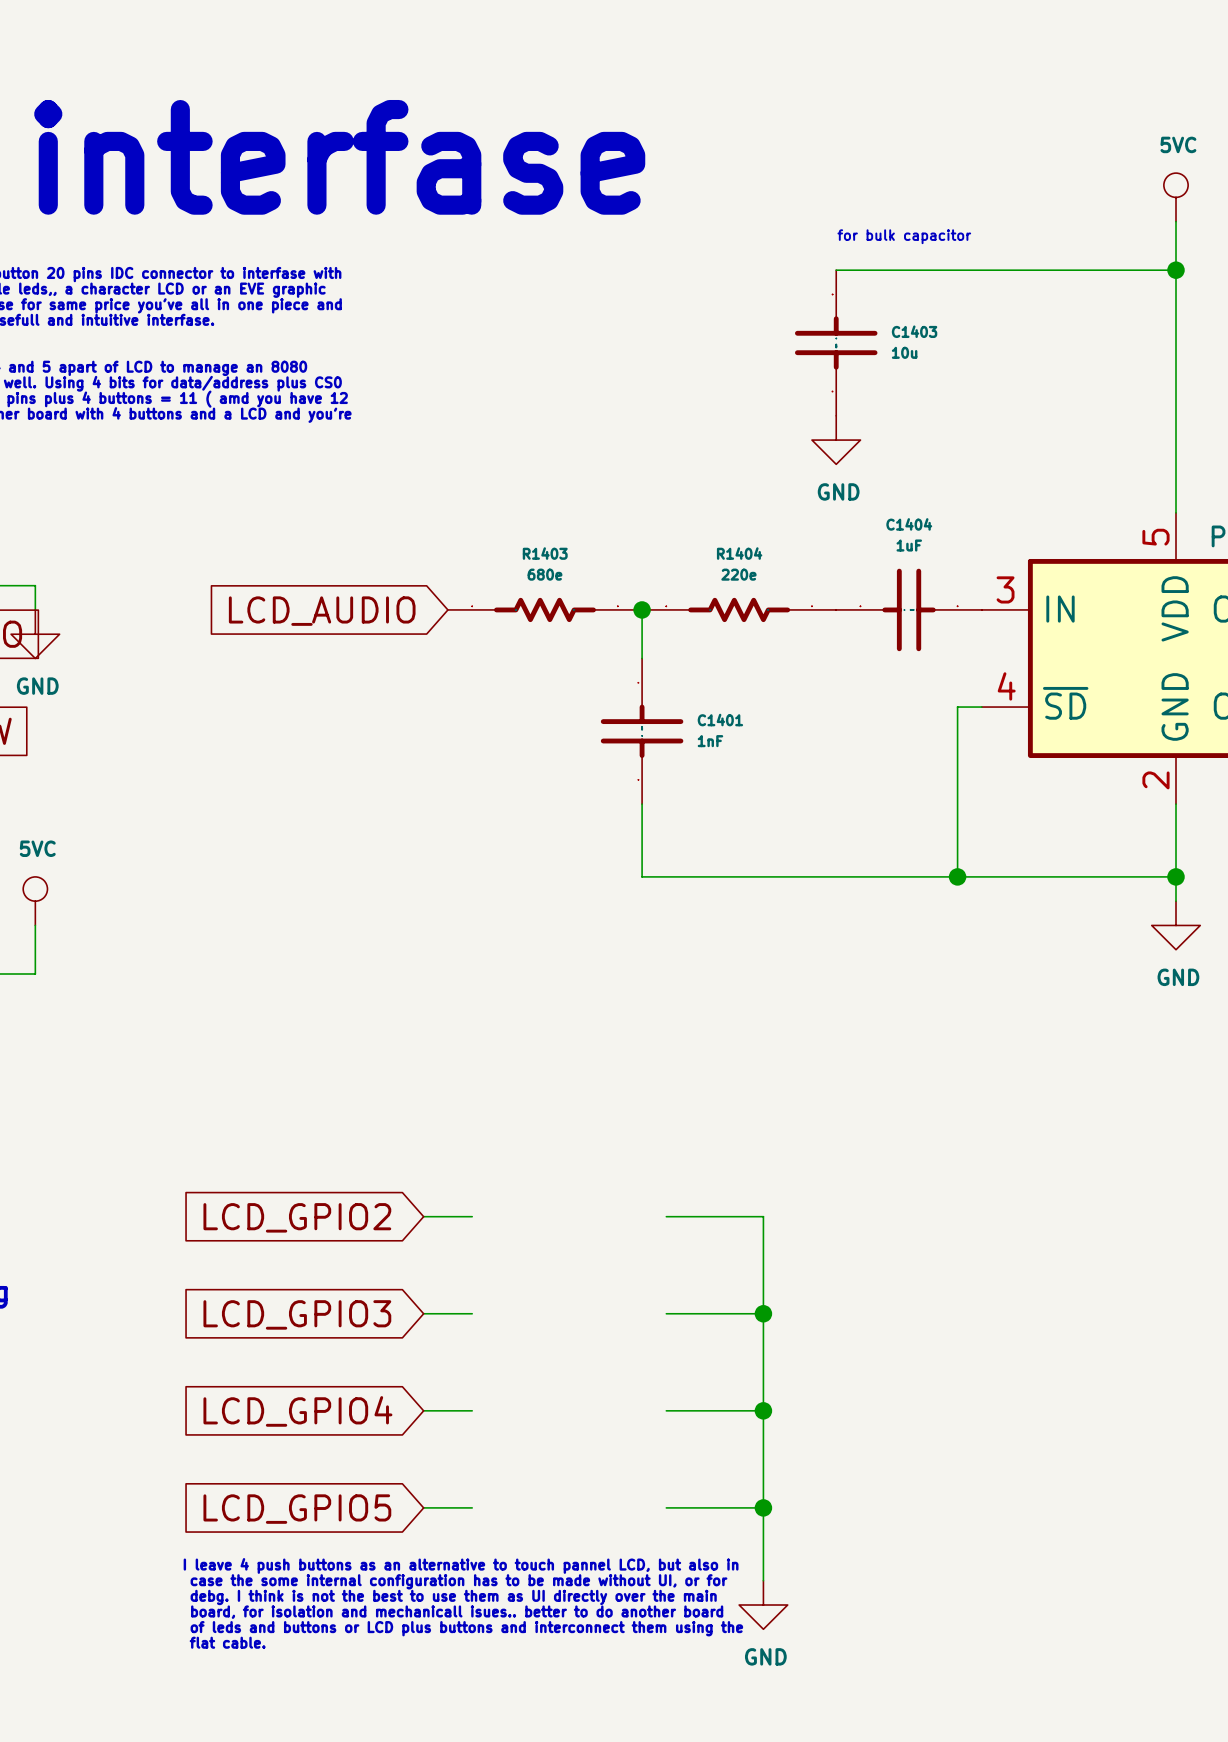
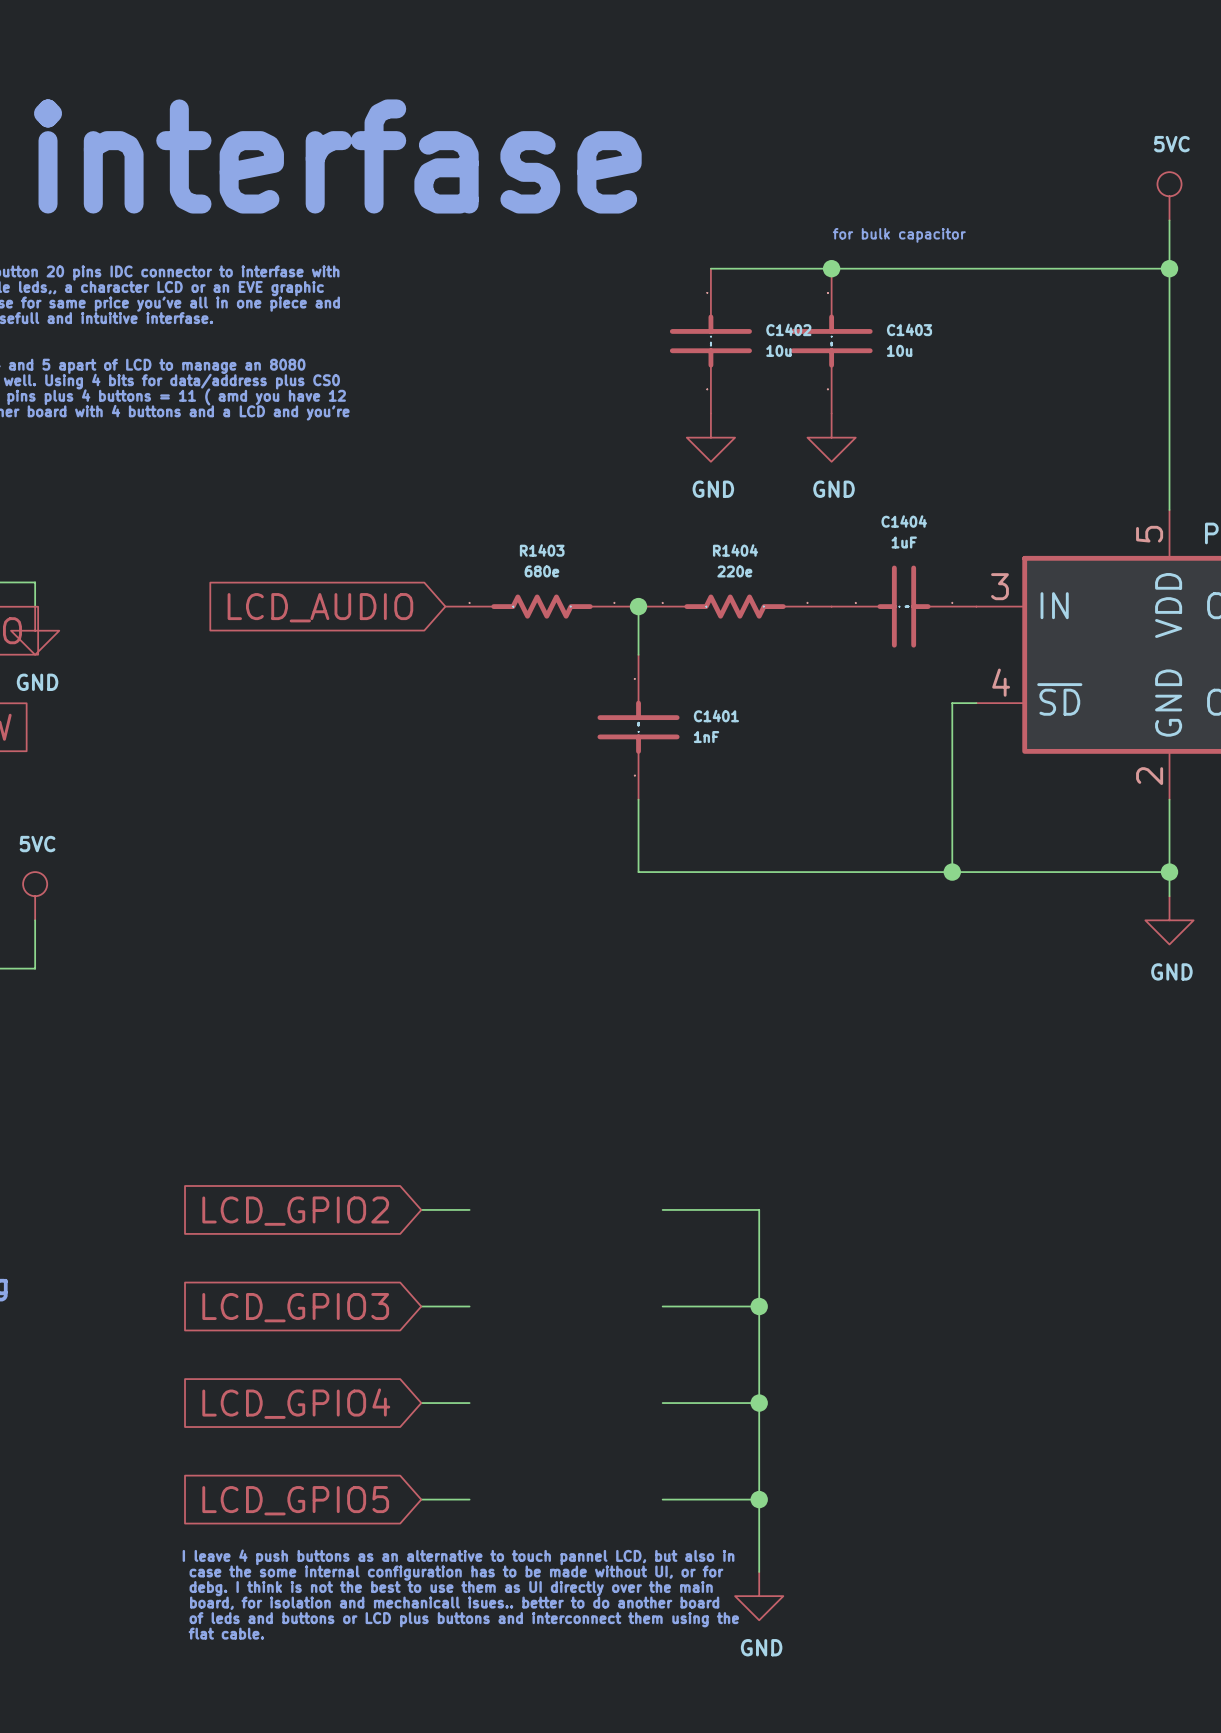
wire: none -> (710, 268) (831, 268)
junction: none -> (831, 268)
C1402: none -> 10u (710, 341)
power symbol: none -> GND (710, 437)

